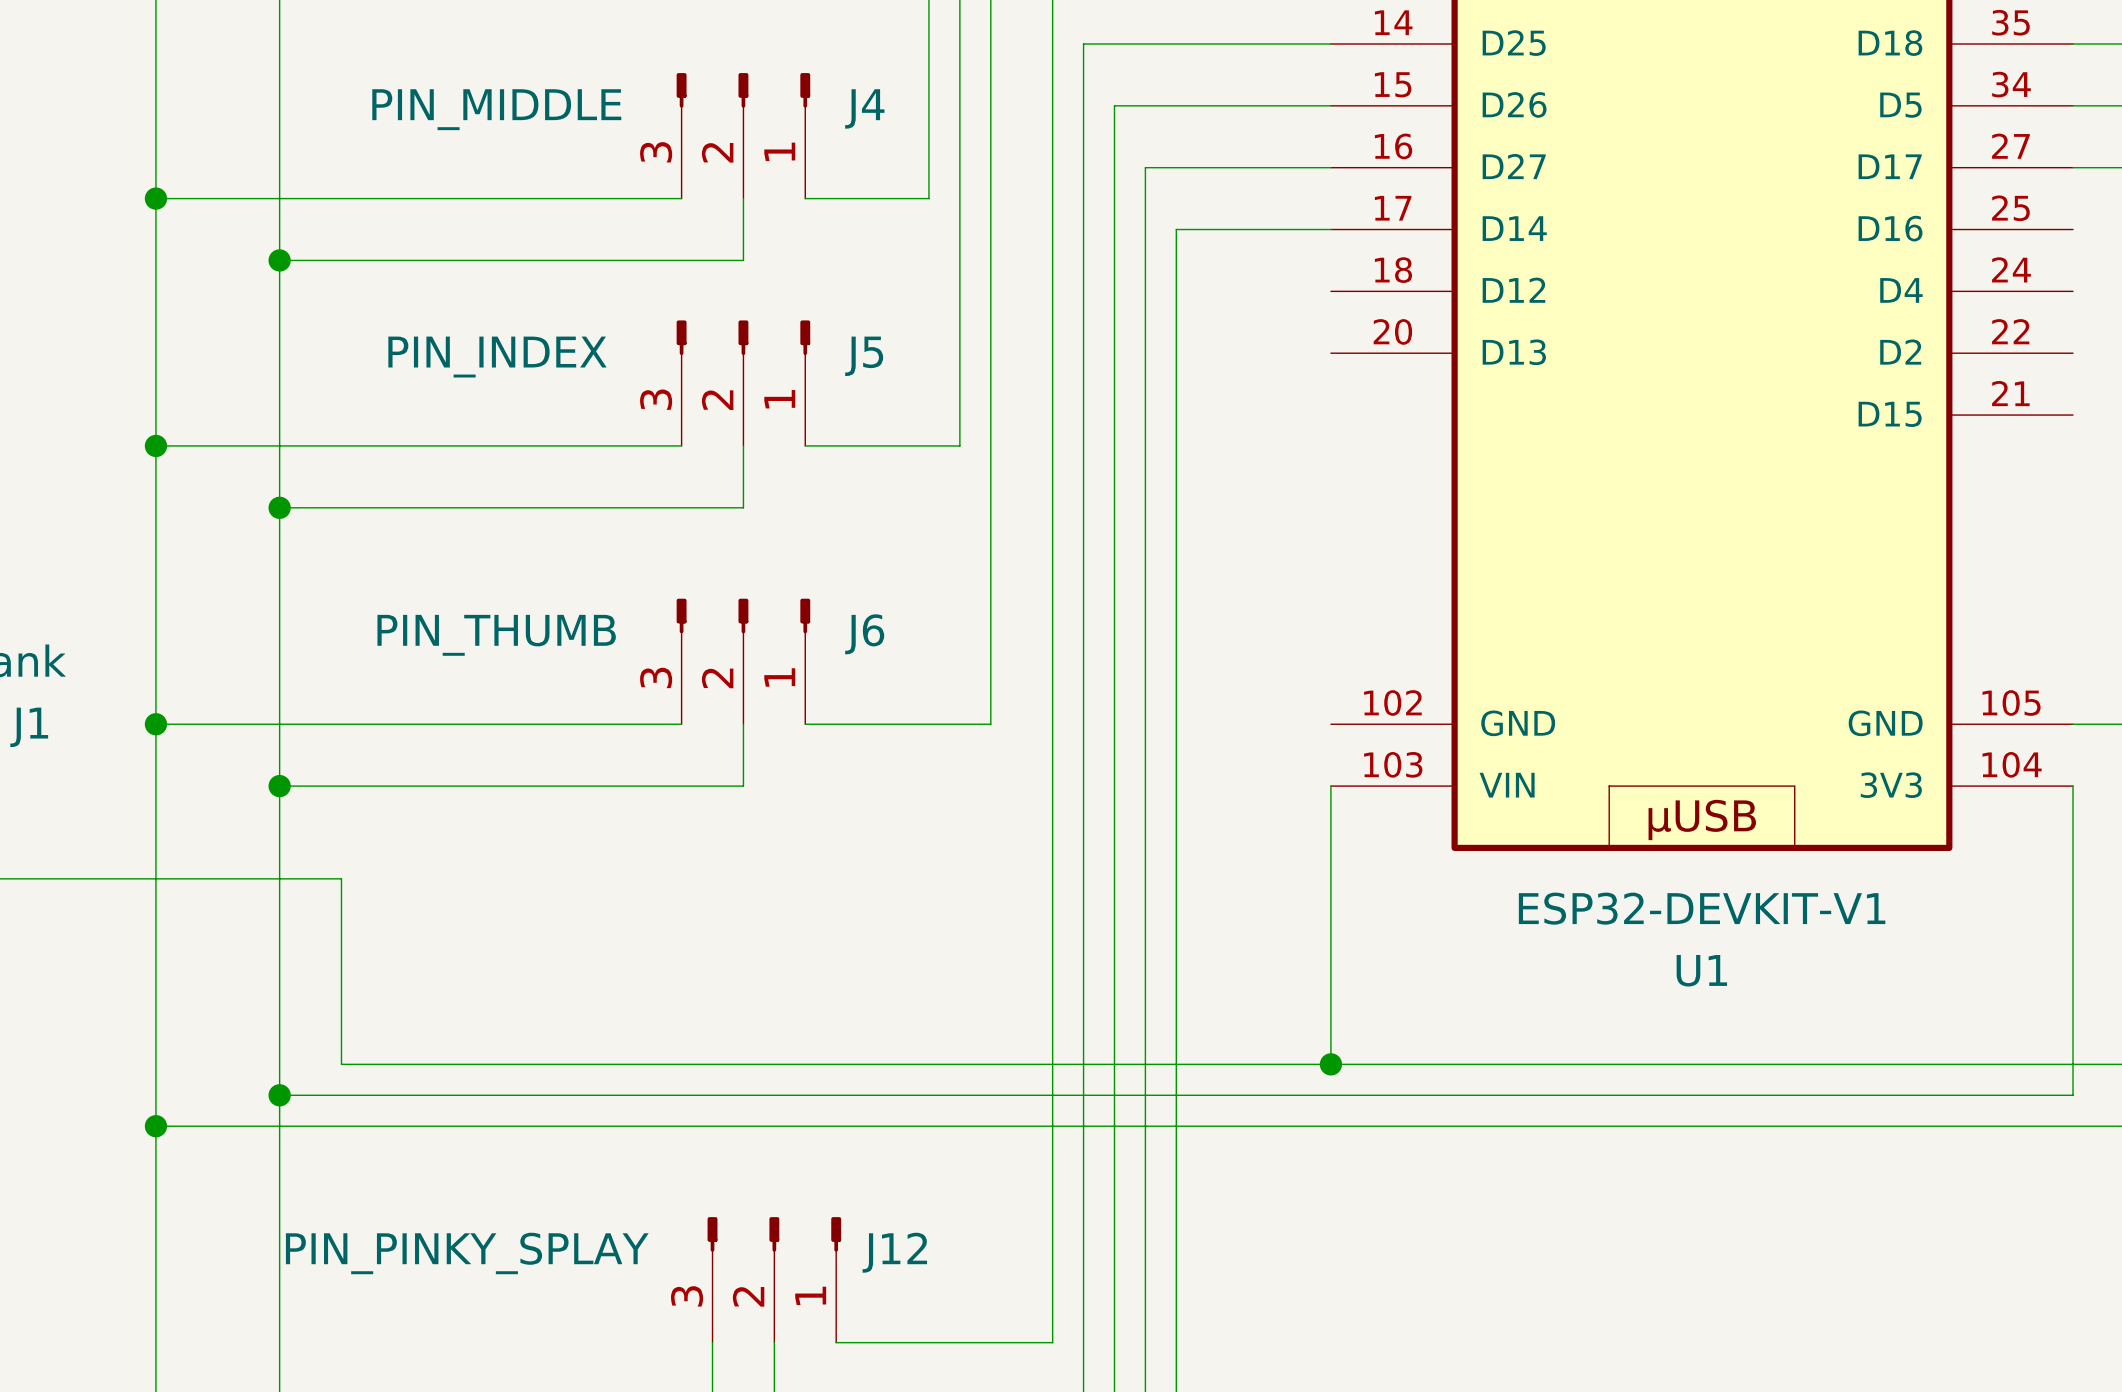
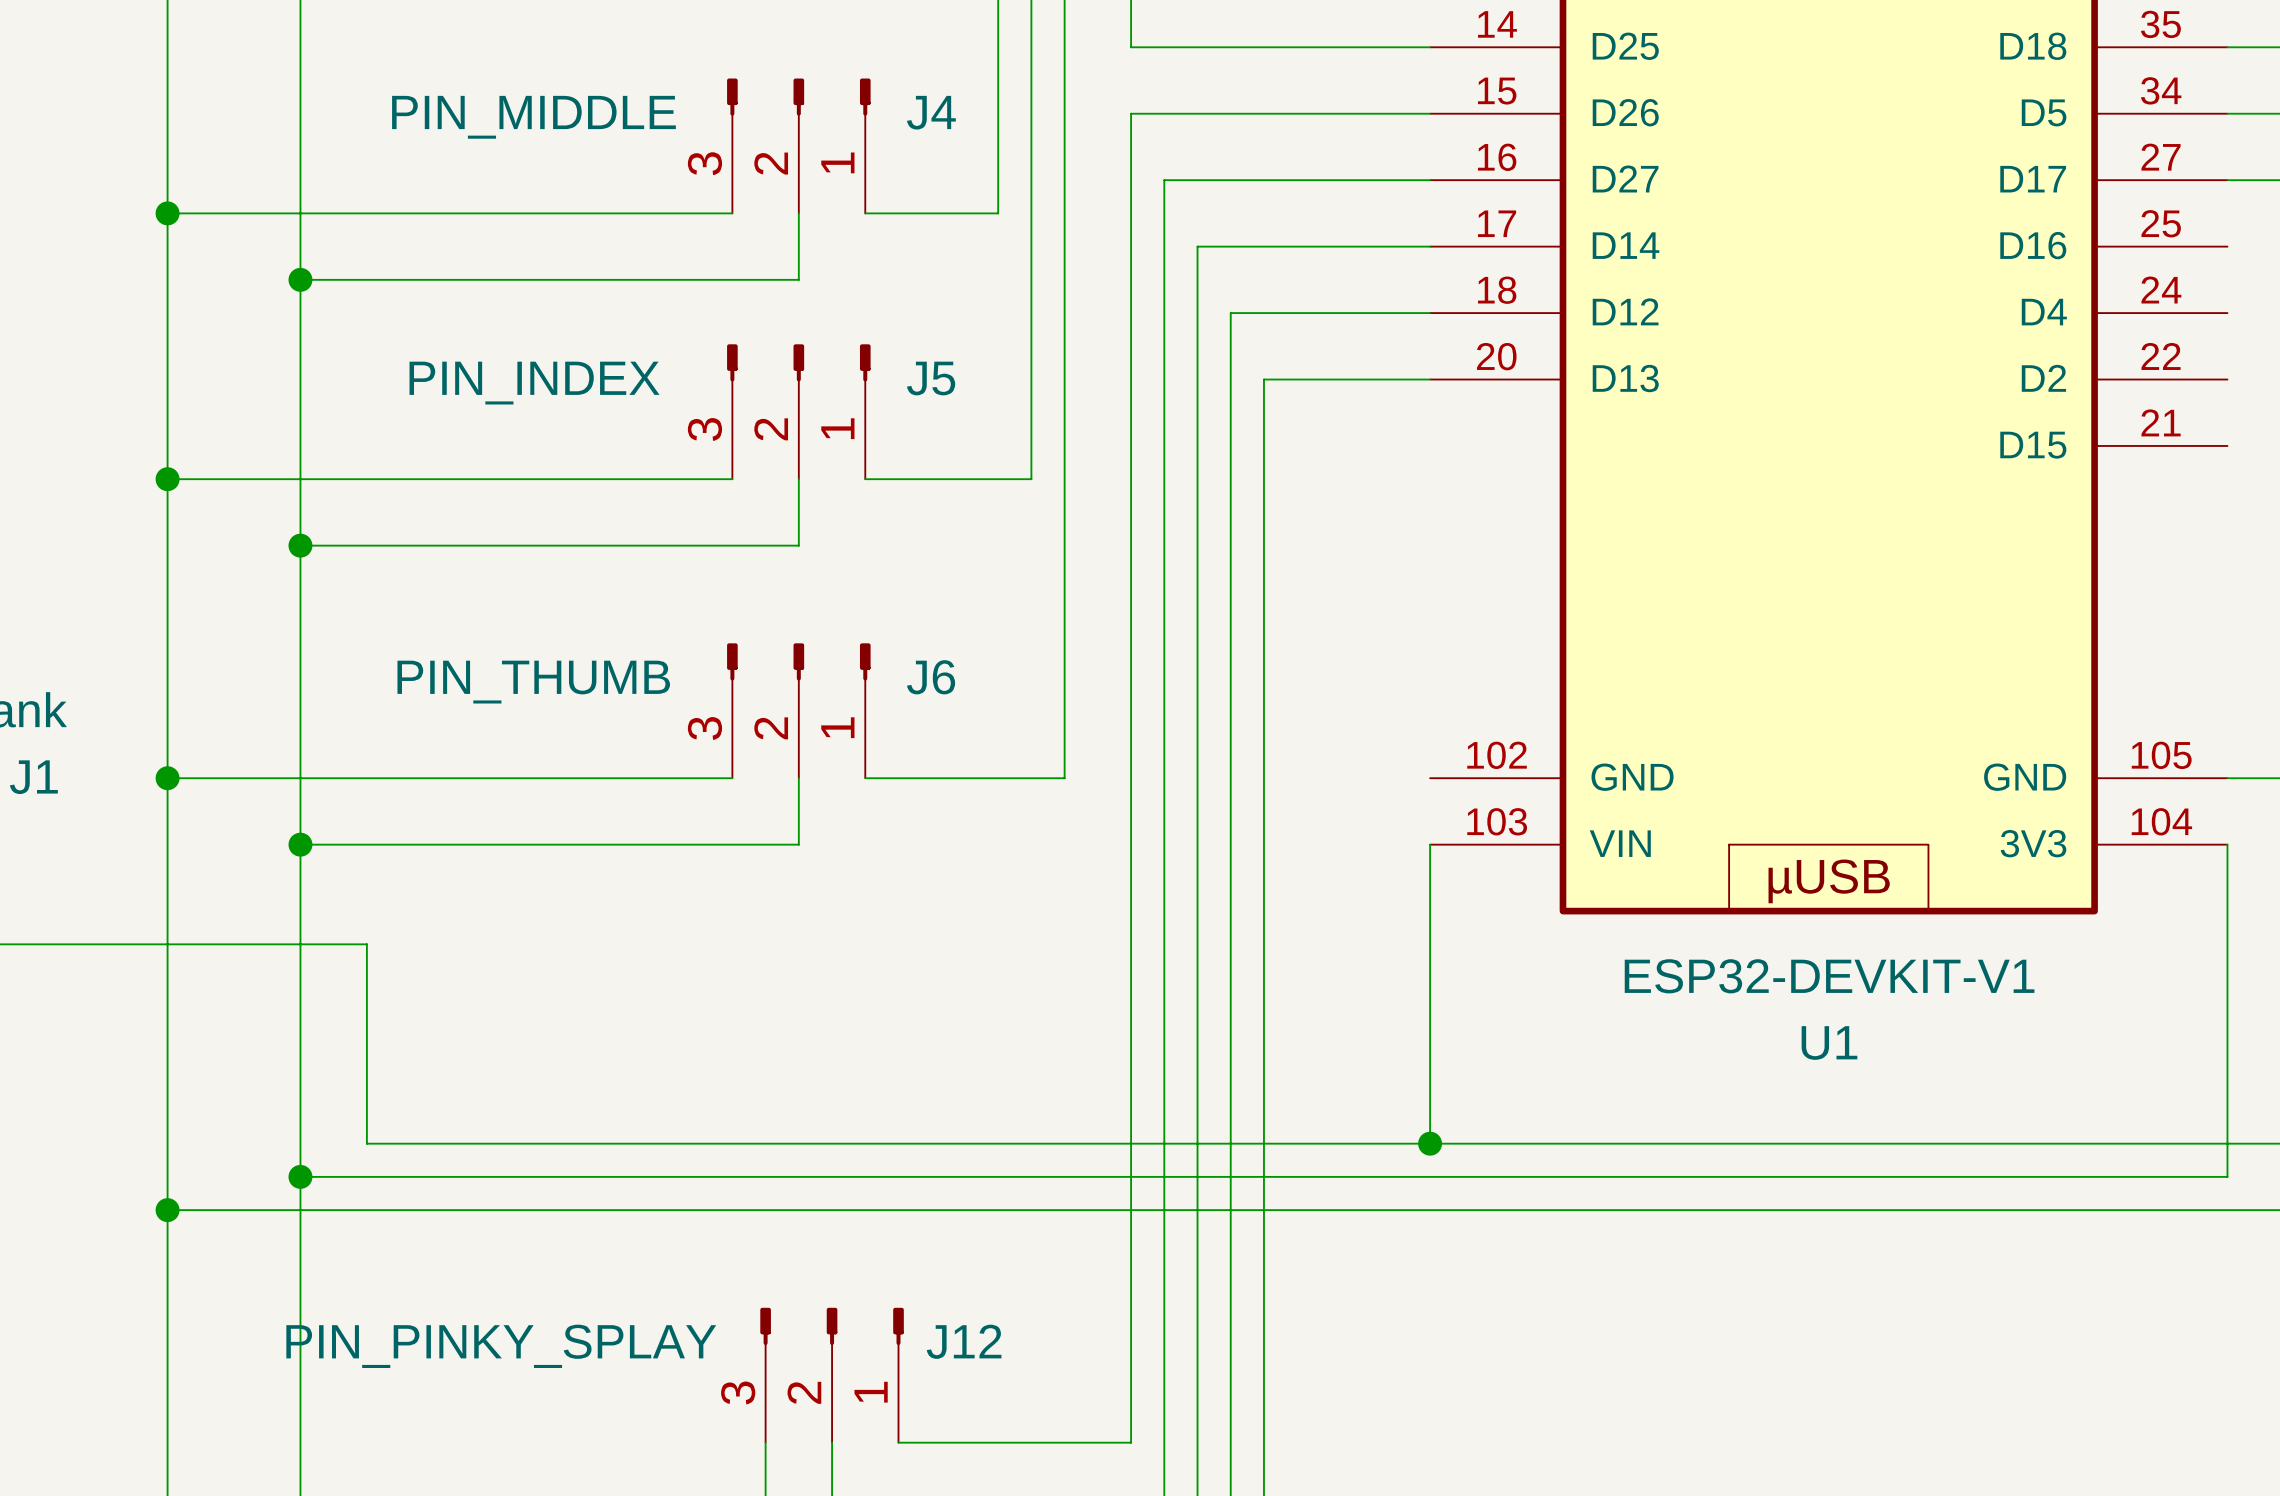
wire: (1052, 44) (1052, 105) -> (1131, 47) (1164, 47)
wire: (1083, 44) (1083, 167) -> (1230, 180) (1164, 180)
wire: none -> (1131, 113) (1197, 113)
wire: (1114, 105) (1114, 229) -> (1263, 246) (1197, 246)
wire: (1145, 167) (1145, 291) -> (1430, 313) (1230, 313)
wire: (1176, 229) (1176, 353) -> (1430, 379) (1263, 379)

